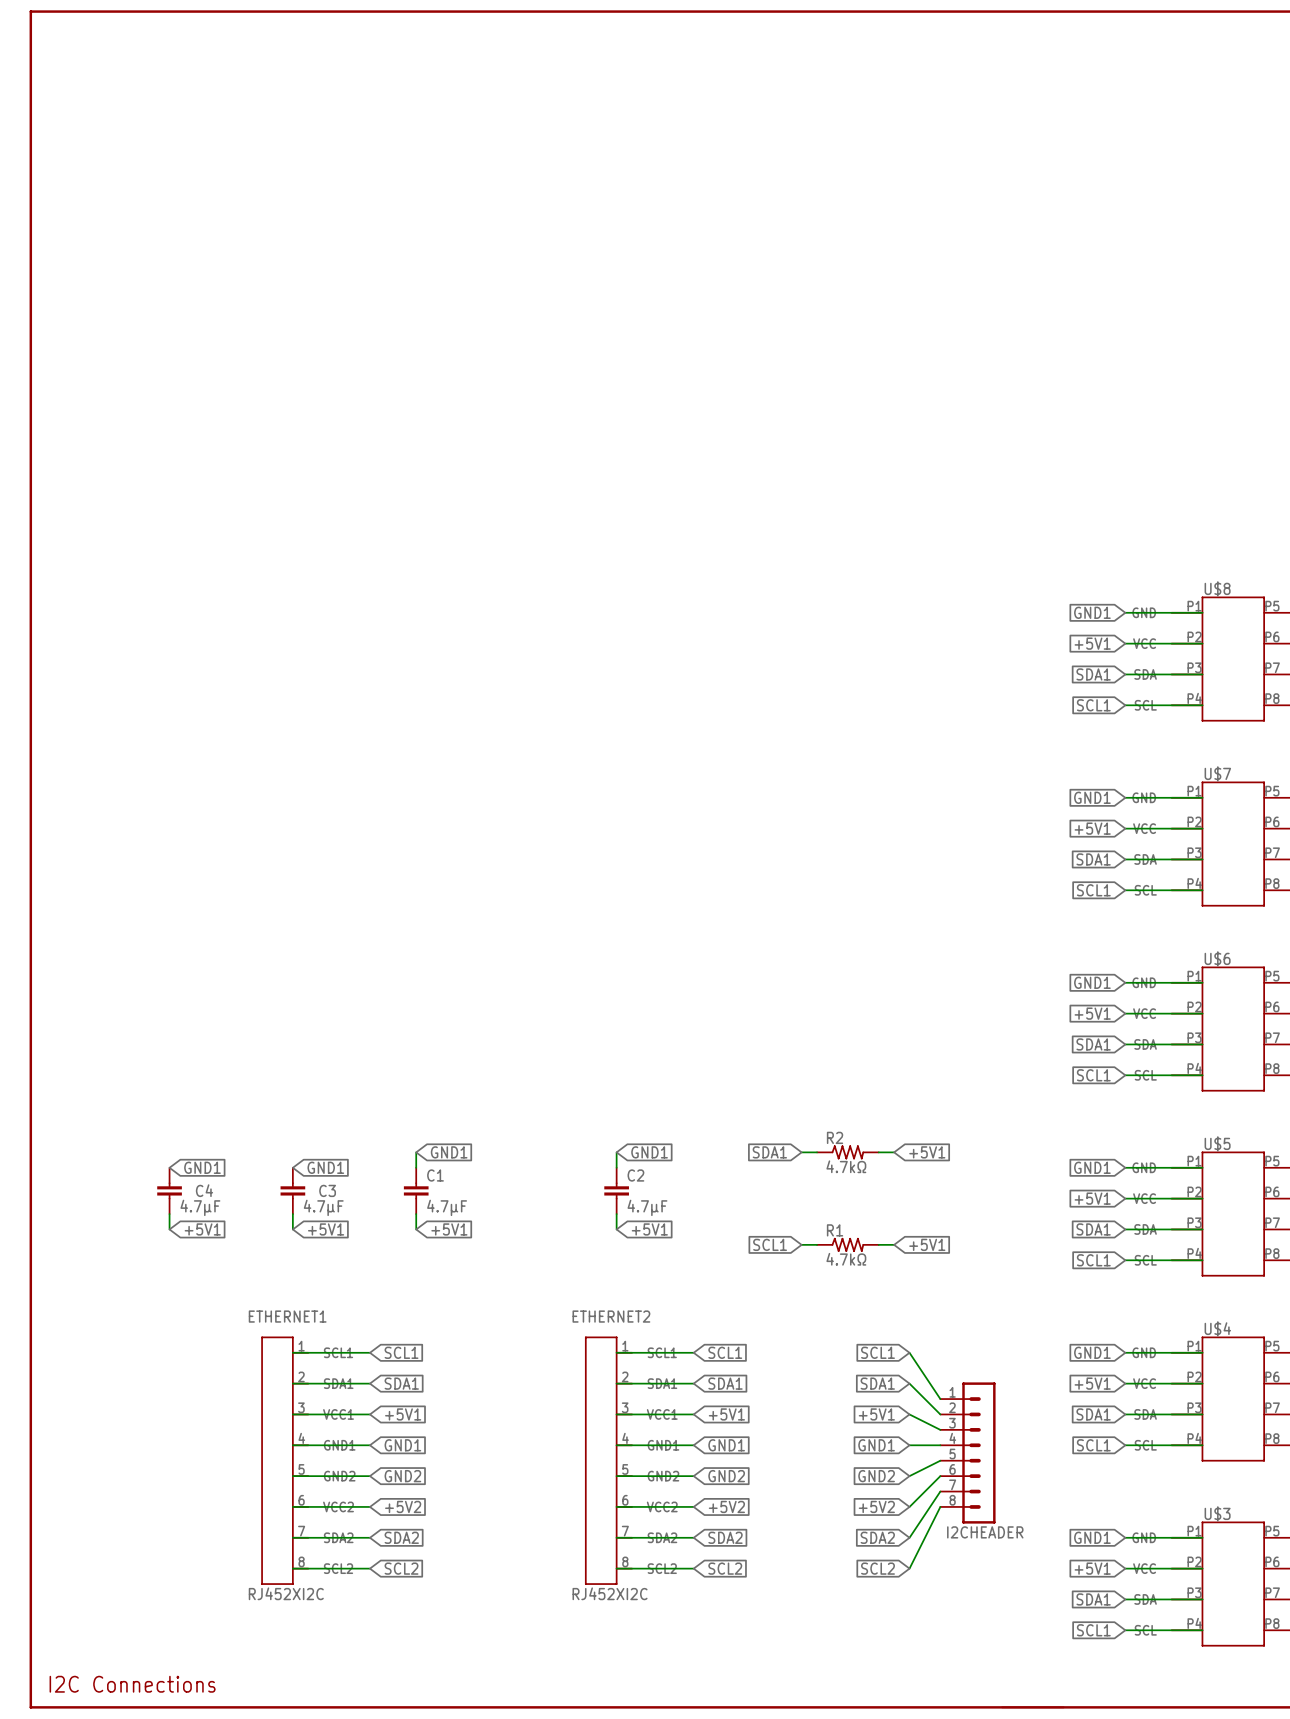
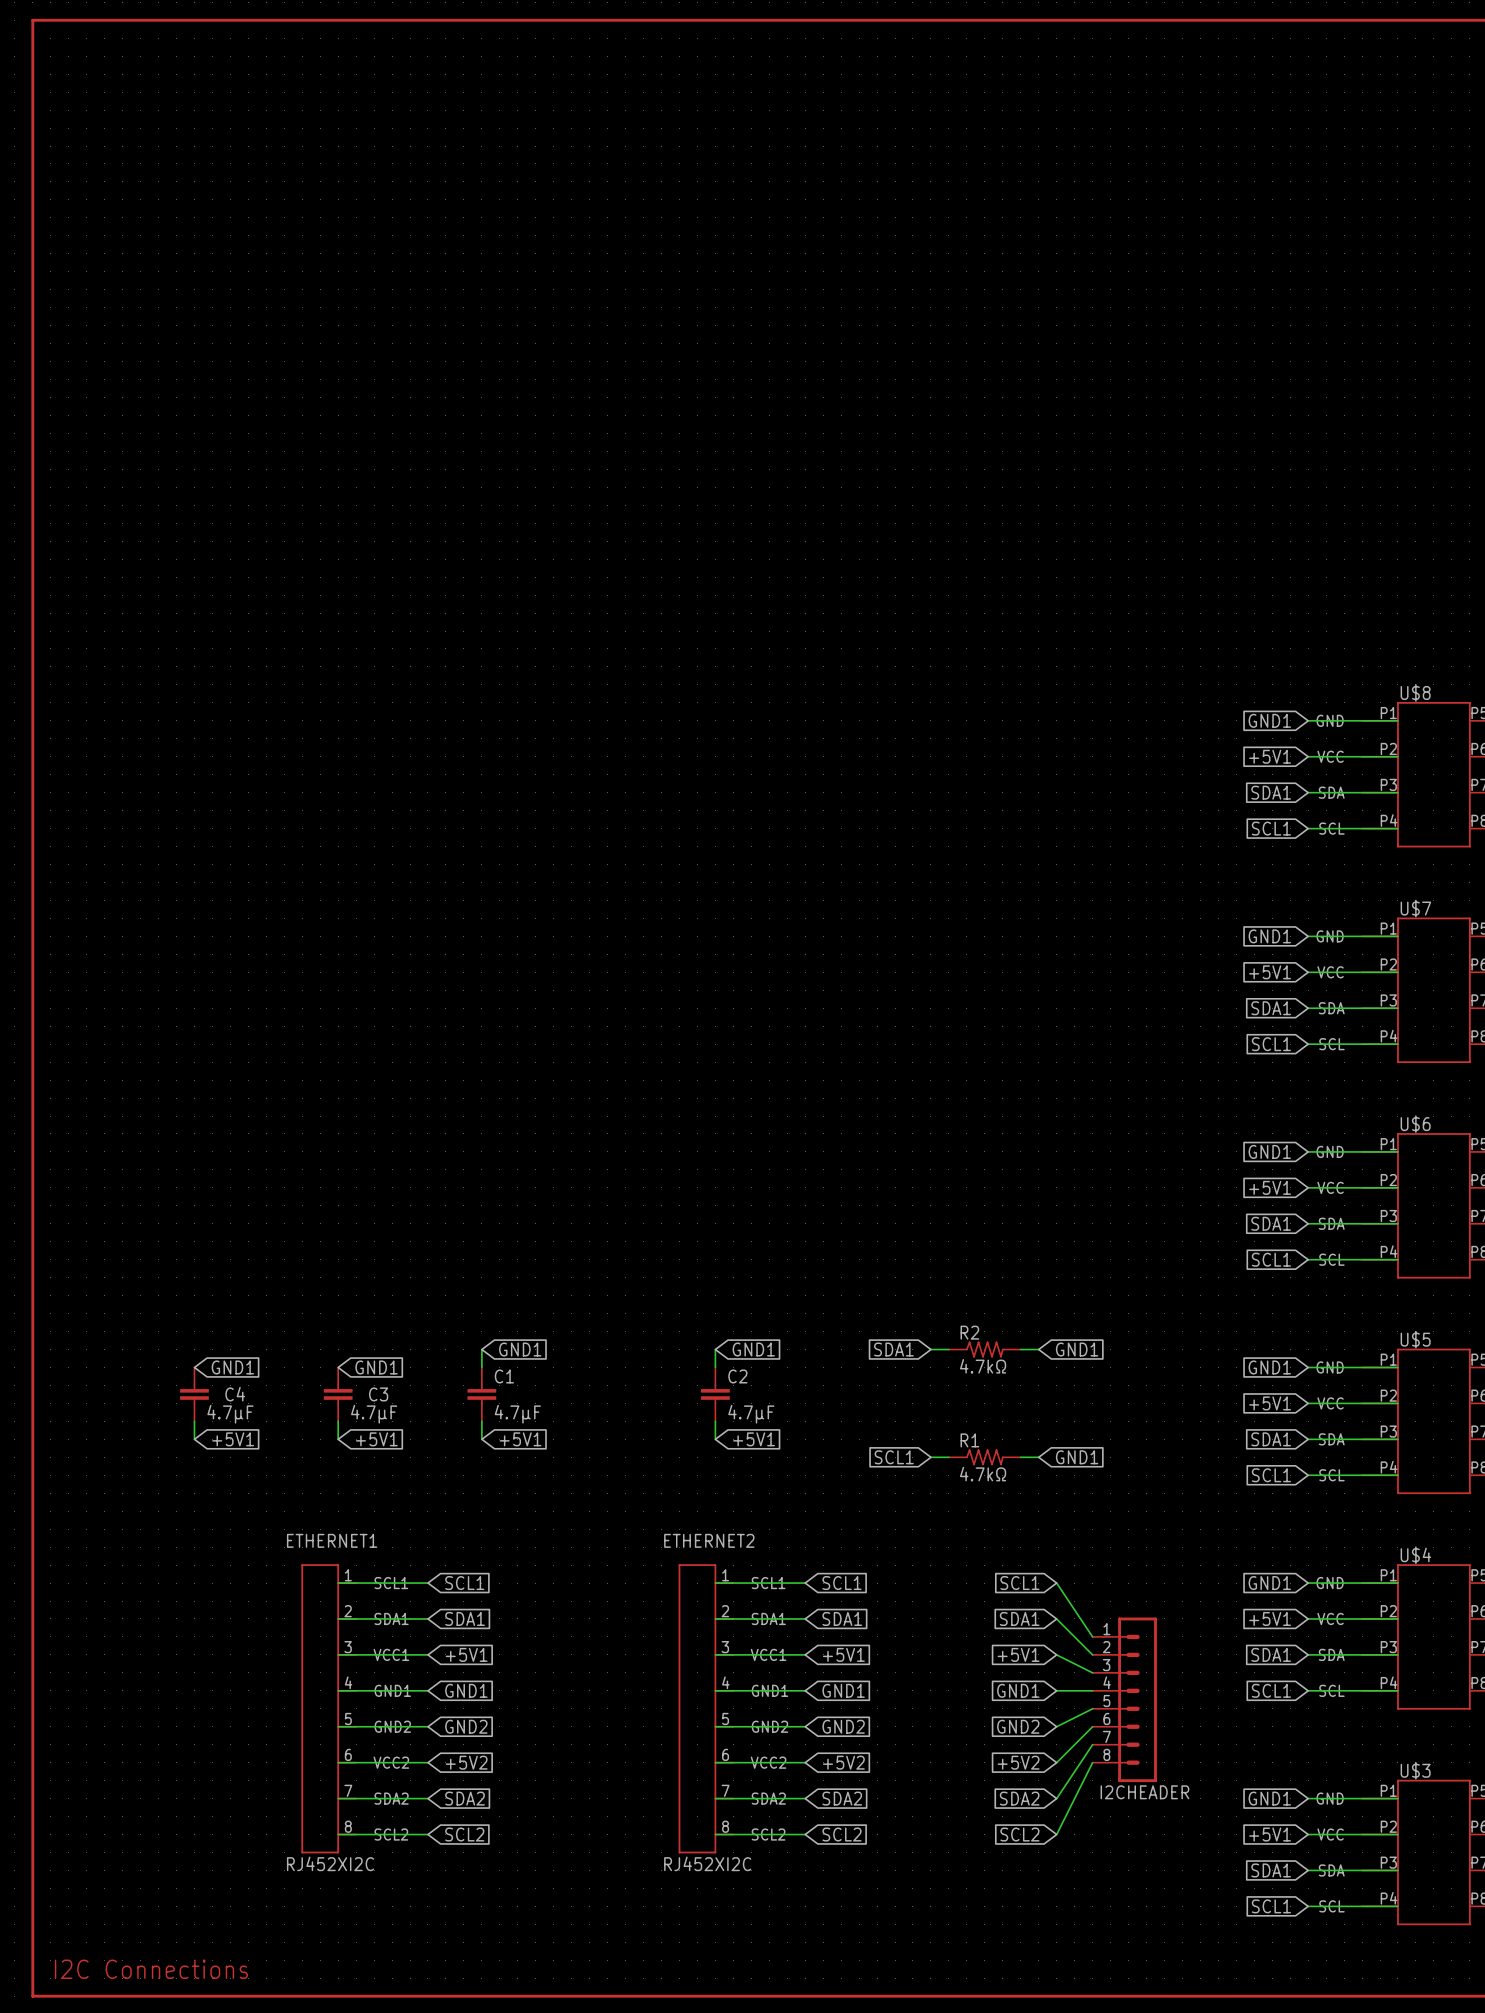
global label: +5V1 (927, 1152) -> GND1 (1077, 1349)
global label: +5V1 (927, 1244) -> GND1 (1077, 1457)

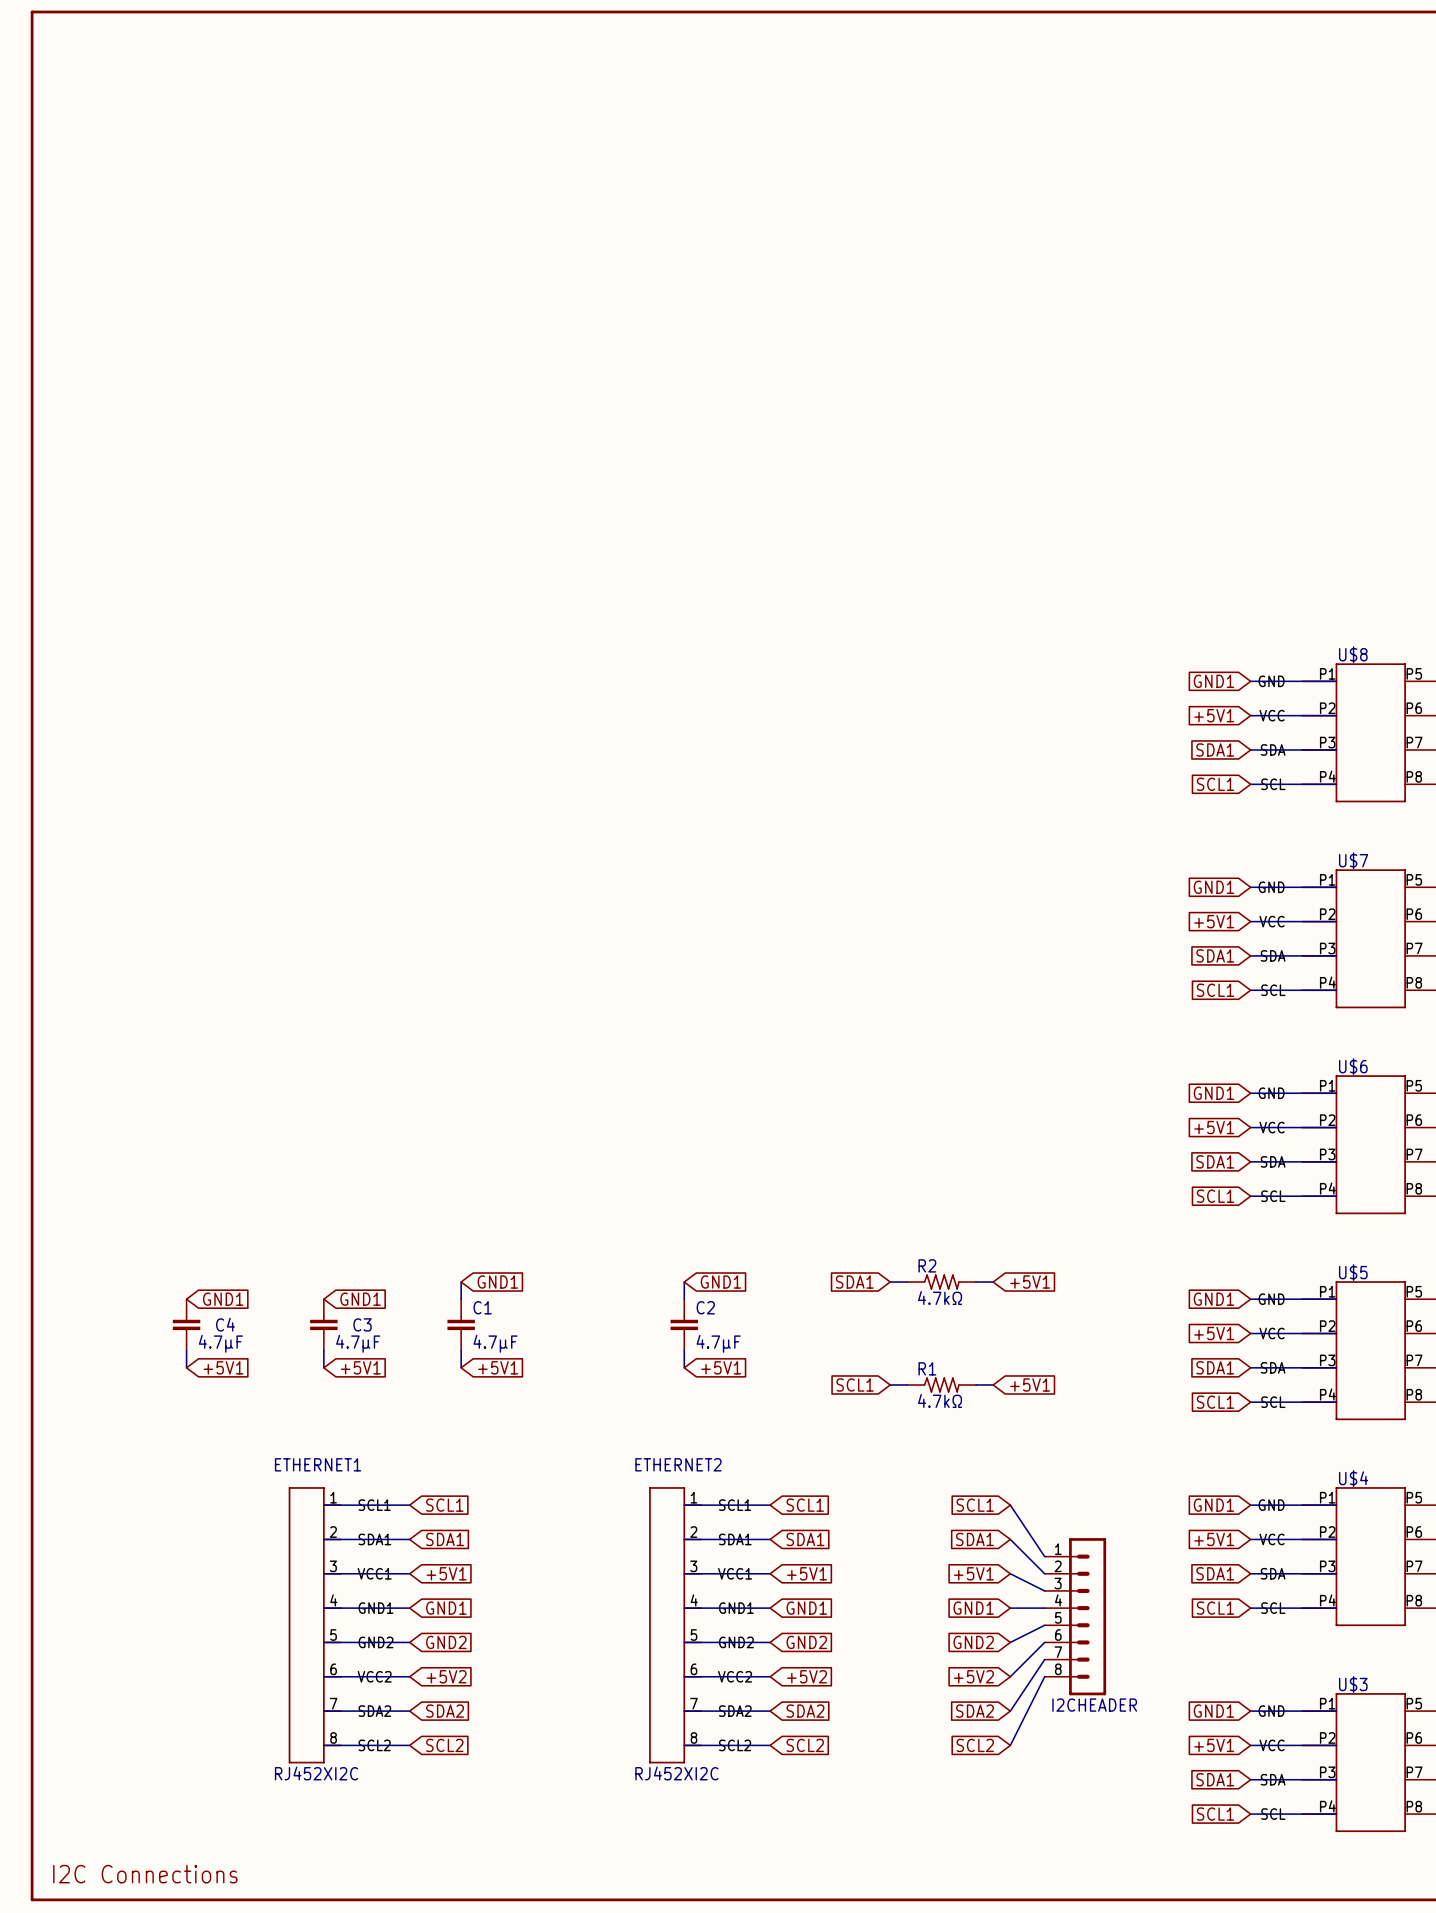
global label: GND1 (1077, 1349) -> +5V1 (1030, 1282)
global label: GND1 (1077, 1457) -> +5V1 (1030, 1385)

